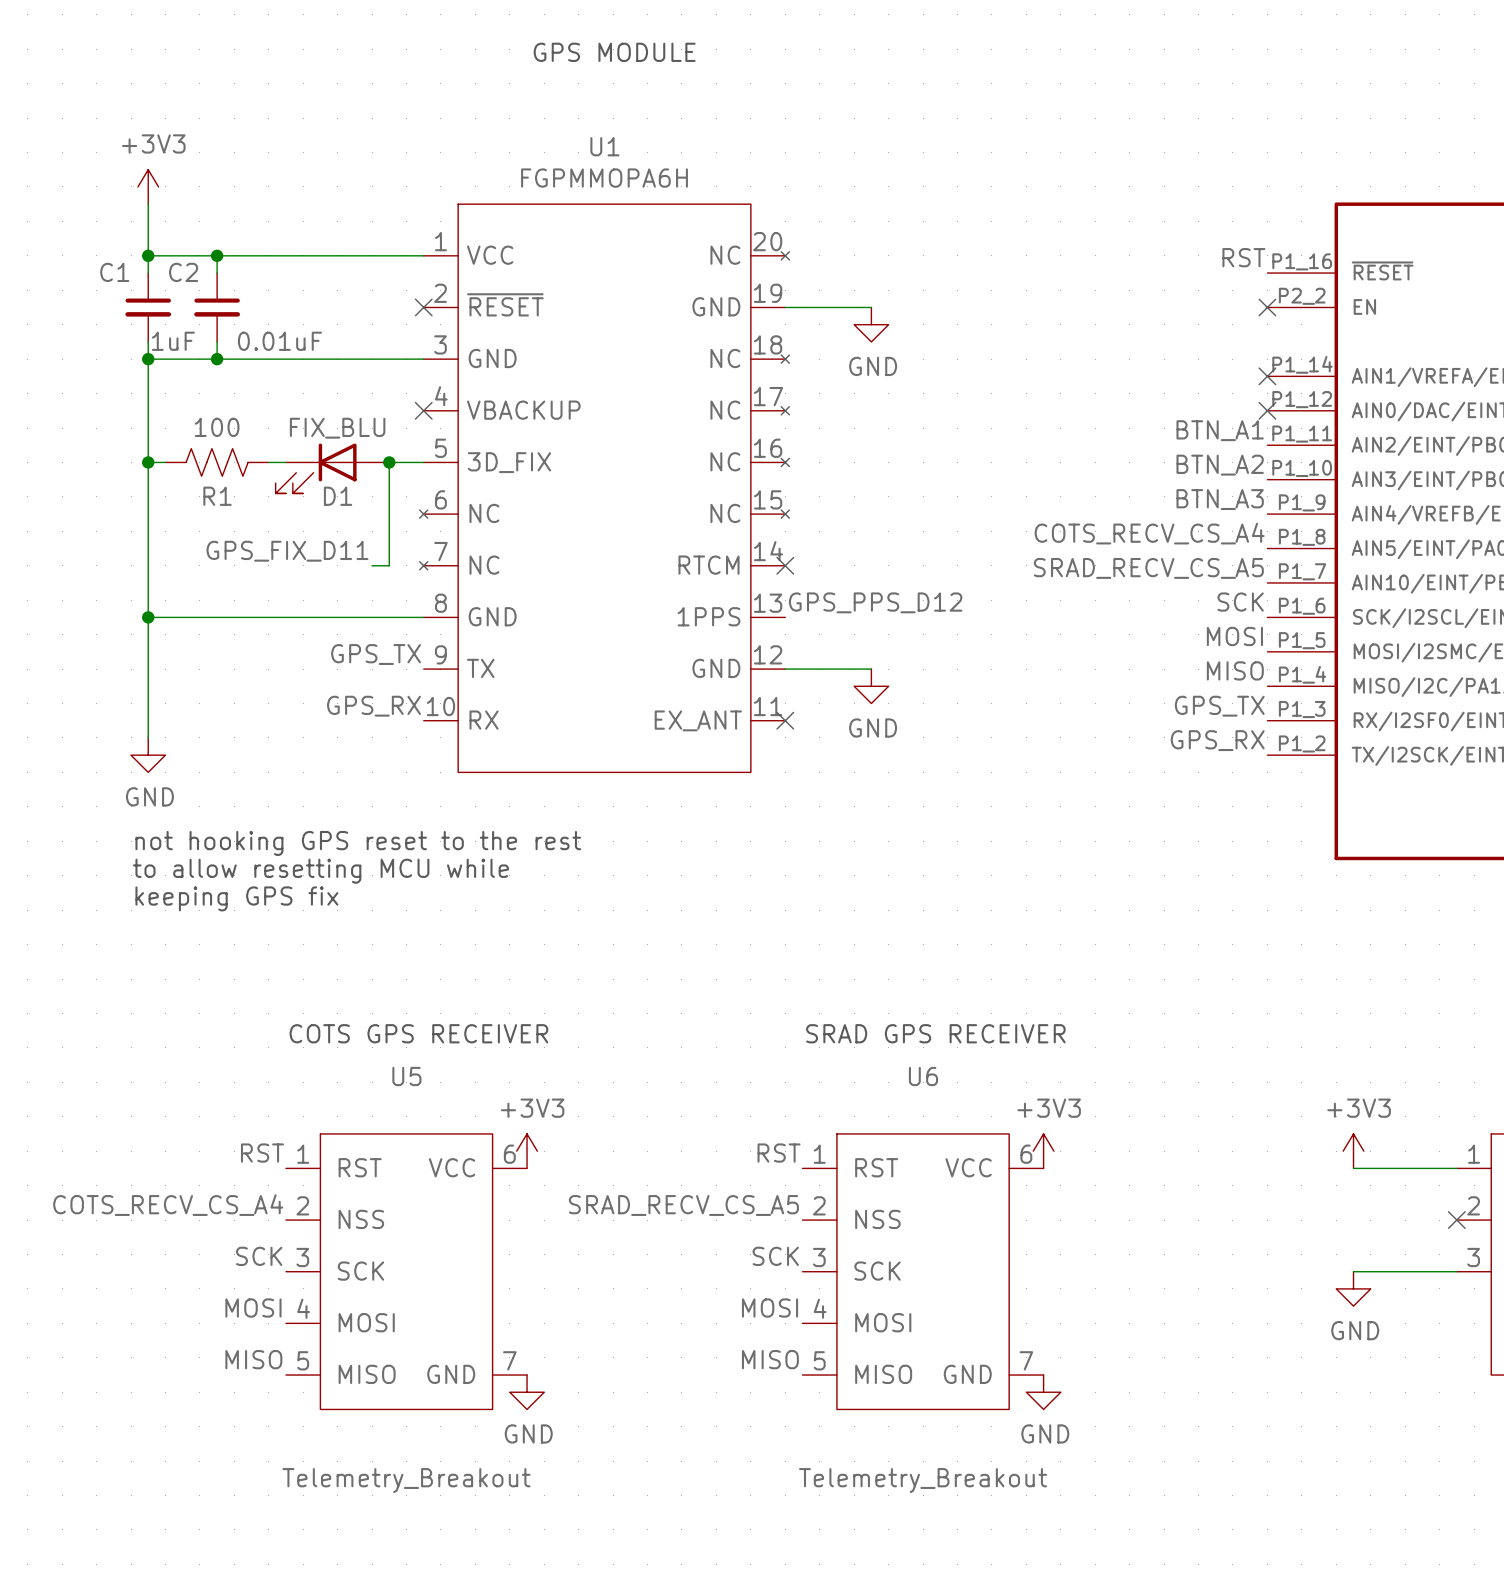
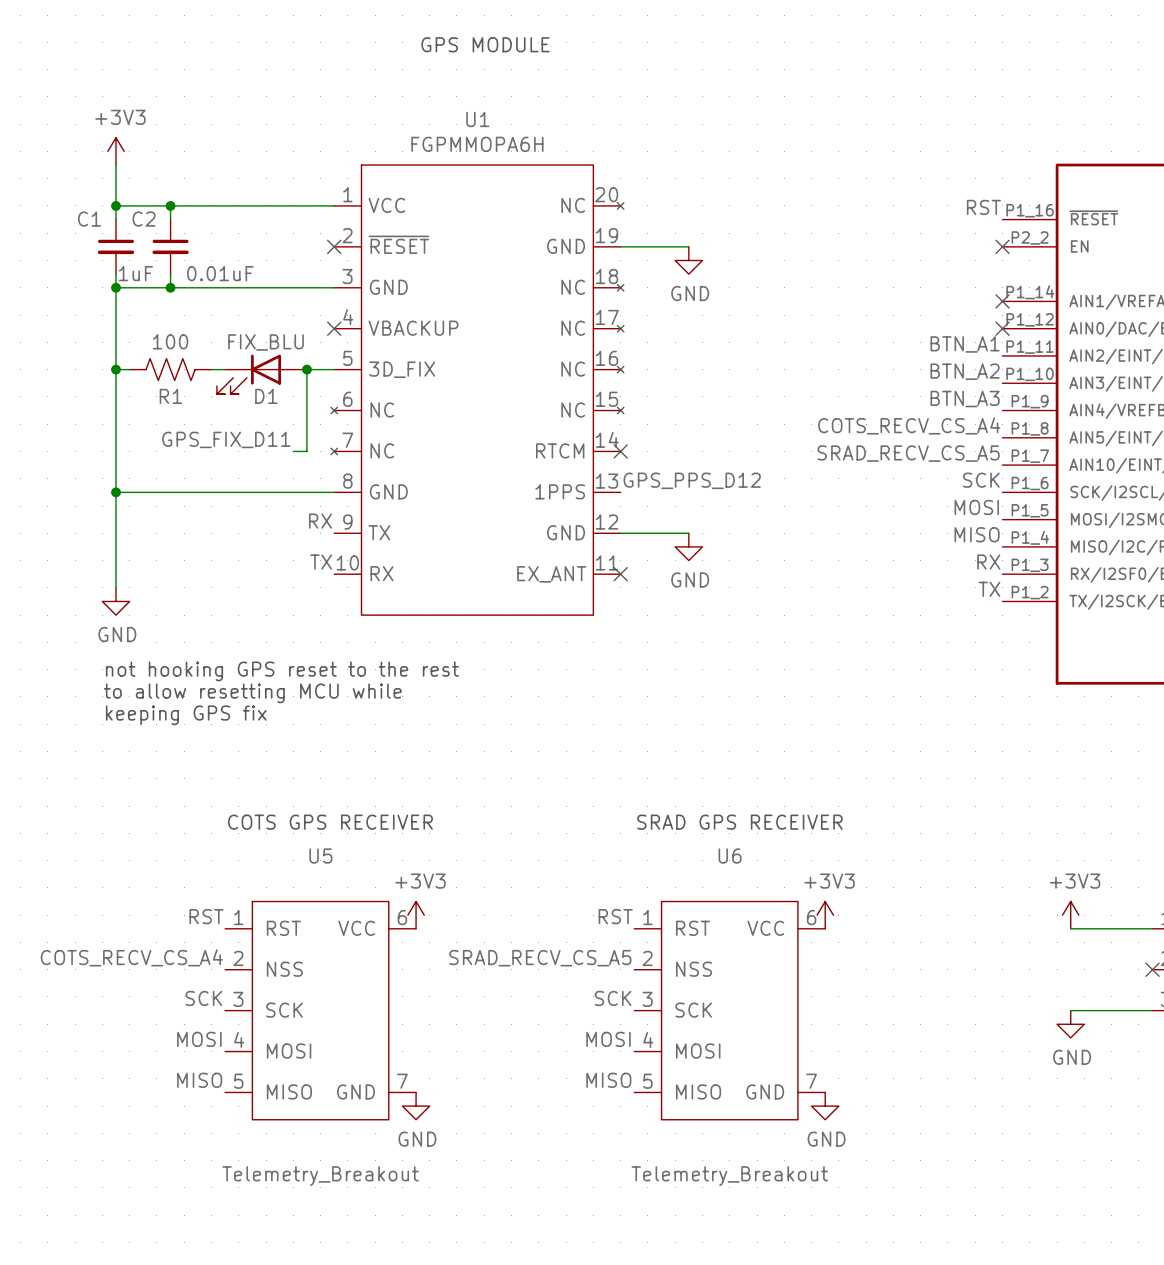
label: GPS_TX (376, 654) -> RX (320, 521)
label: GPS_RX (373, 706) -> TX (321, 562)
label: GPS_TX (1219, 706) -> RX (988, 562)
label: GPS_RX (1217, 740) -> TX (989, 589)

